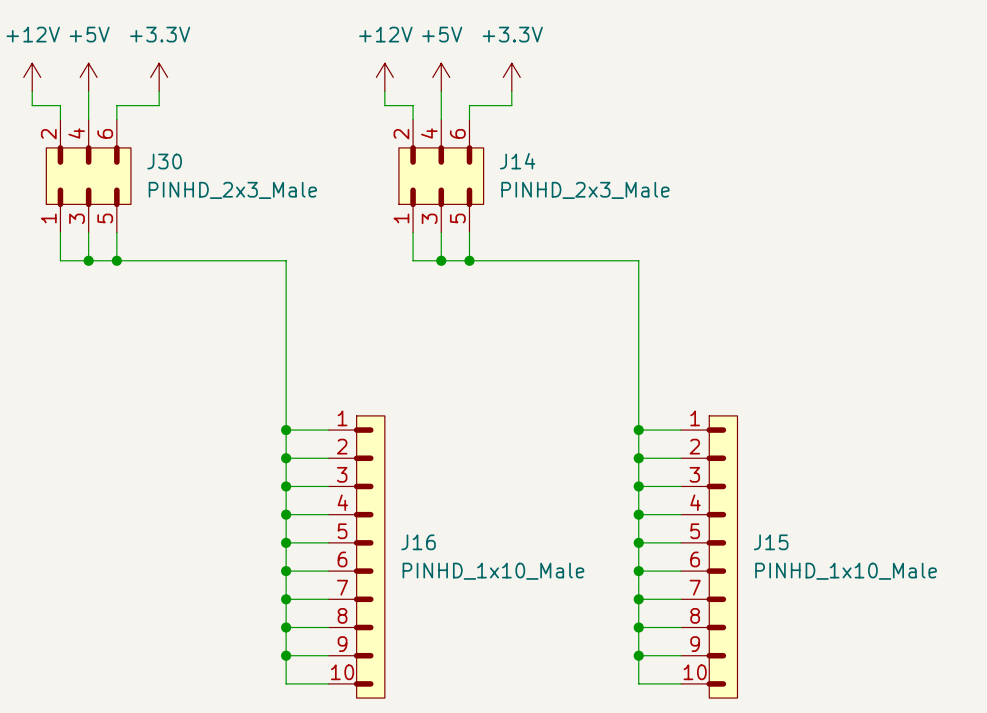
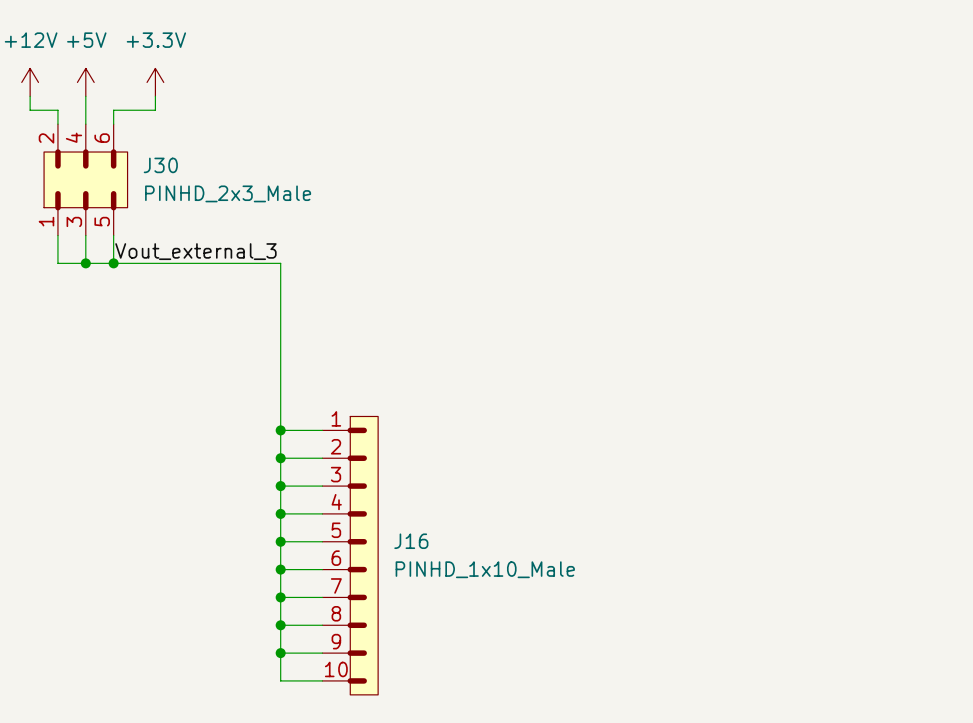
power symbol: +12V (384, 77) -> none
power symbol: +5V (441, 77) -> none
power symbol: +3.3V (511, 77) -> none
wire: (384, 91) (384, 105) (413, 105) (413, 119) -> none
wire: (441, 91) (441, 119) -> none
wire: (511, 91) (511, 105) (469, 105) (469, 119) -> none
J14: PINHD_2x3_Male (441, 176) -> none
wire: (413, 232) (413, 260) (638, 260) (638, 683) (681, 683) -> none
wire: (441, 232) (441, 260) -> none
wire: (469, 232) (469, 260) -> none
label: none -> Vout_external_3 (195, 251)
junction: (441, 260) -> none
junction: (469, 260) -> none
wire: (638, 430) (681, 430) -> none
junction: (638, 430) -> none
wire: (638, 458) (681, 458) -> none
junction: (638, 458) -> none
wire: (638, 486) (681, 486) -> none
junction: (638, 486) -> none
wire: (638, 514) (681, 514) -> none
junction: (638, 514) -> none
wire: (638, 542) (681, 542) -> none
junction: (638, 542) -> none
J15: PINHD_1x10_Male (709, 556) -> none
wire: (638, 571) (681, 571) -> none
junction: (638, 571) -> none
wire: (638, 599) (681, 599) -> none
junction: (638, 599) -> none
wire: (638, 627) (681, 627) -> none
junction: (638, 627) -> none
wire: (638, 655) (681, 655) -> none
junction: (638, 655) -> none

